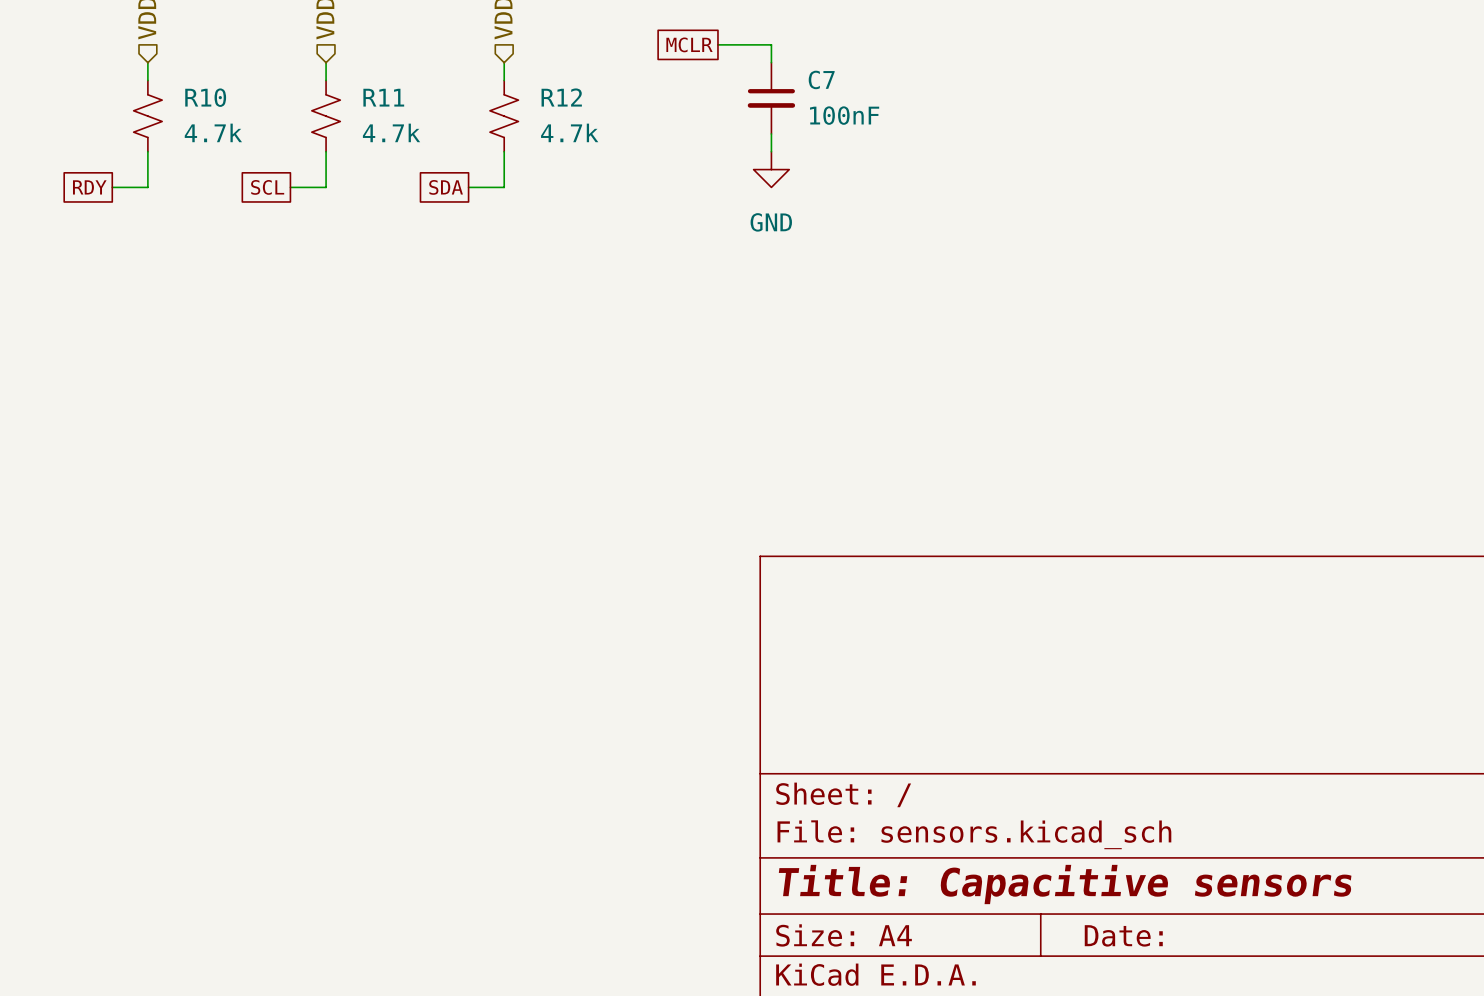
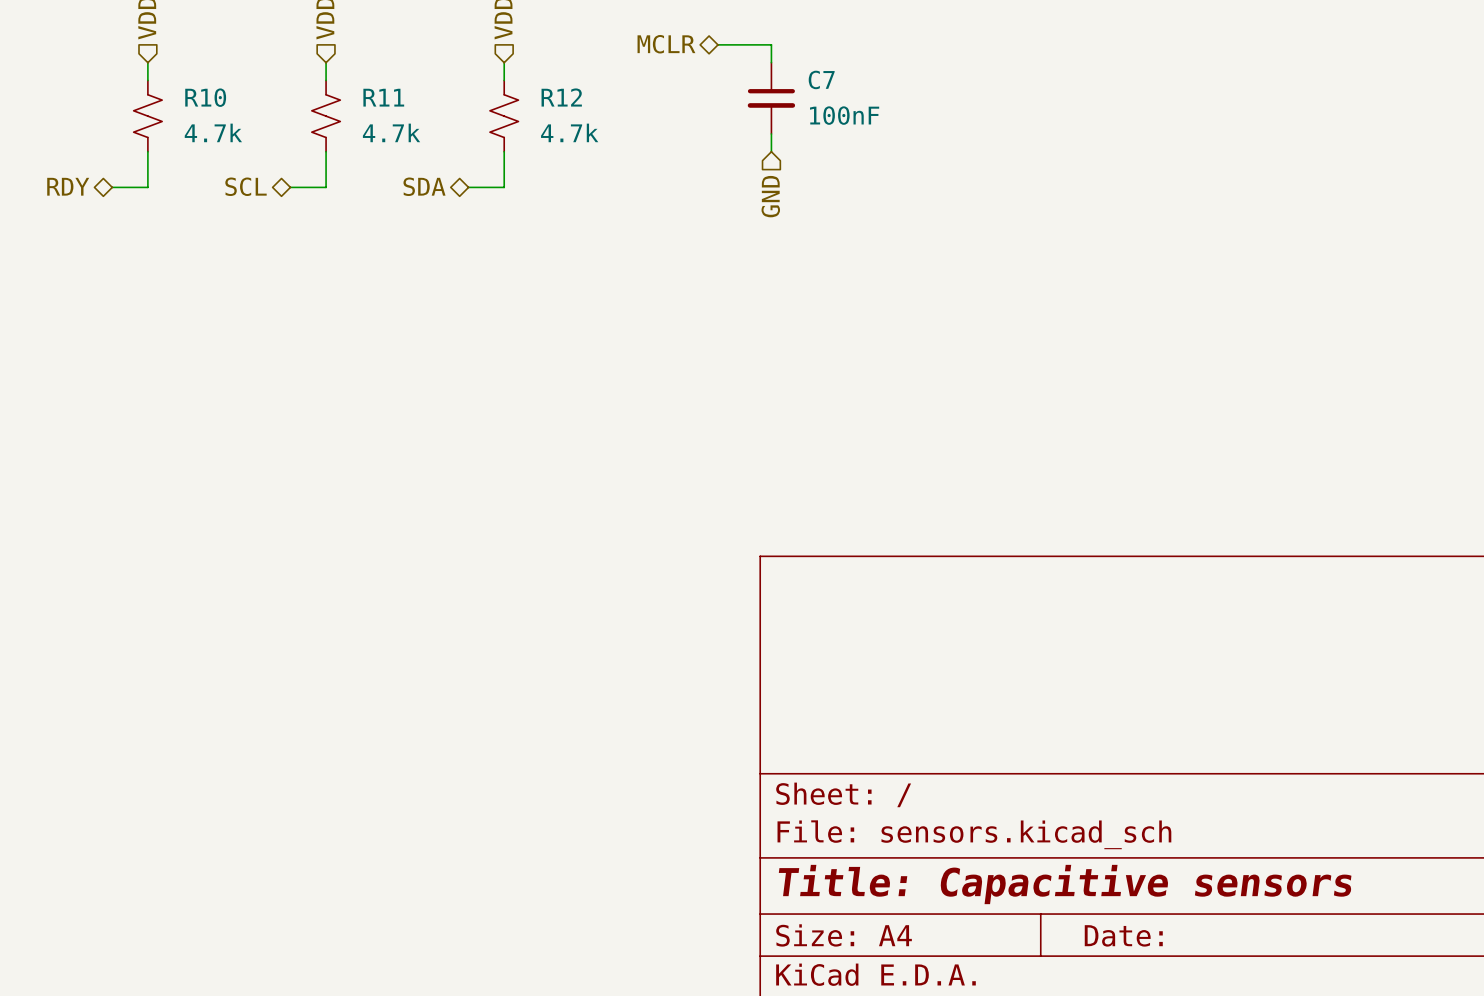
hierarchical label: none -> MCLR (666, 44)
global label: MCLR (689, 44) -> none
power symbol: GND (771, 169) -> none
hierarchical label: none -> RDY (68, 186)
hierarchical label: none -> SCL (246, 186)
hierarchical label: none -> SDA (424, 186)
global label: RDY (89, 187) -> none
global label: SCL (267, 187) -> none
global label: SDA (446, 187) -> none
hierarchical label: none -> GND (770, 196)

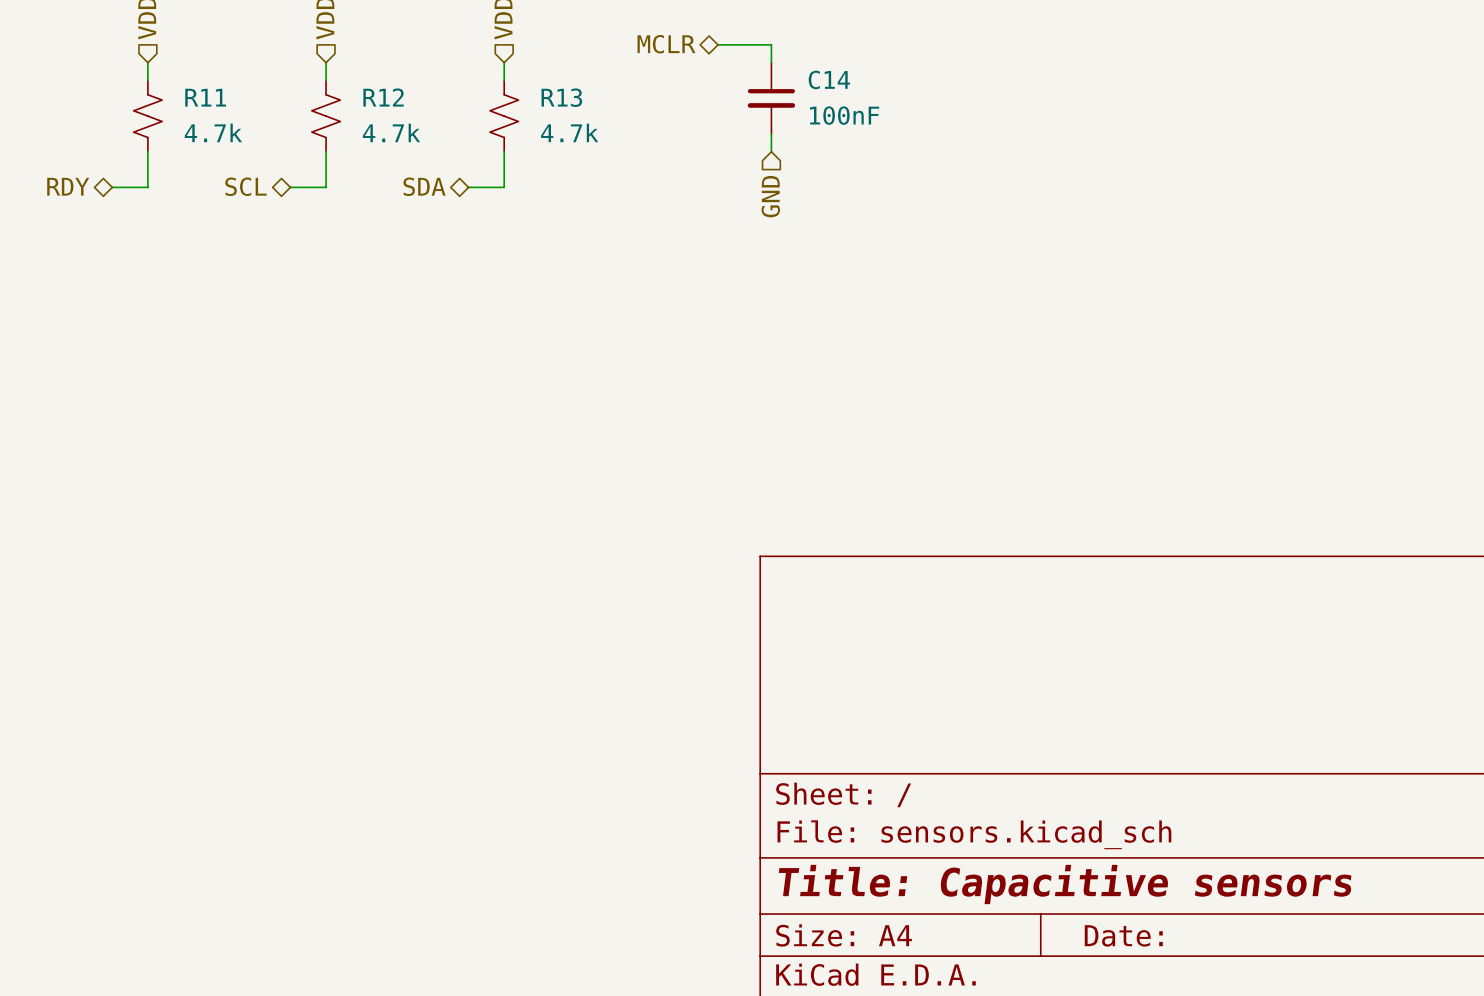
C7 name: C7 (821, 79) -> C14 (829, 79)
R10 name: R10 (205, 97) -> R11 (205, 97)
R11 name: R11 (383, 97) -> R12 (383, 97)
R12 name: R12 (561, 97) -> R13 (561, 97)

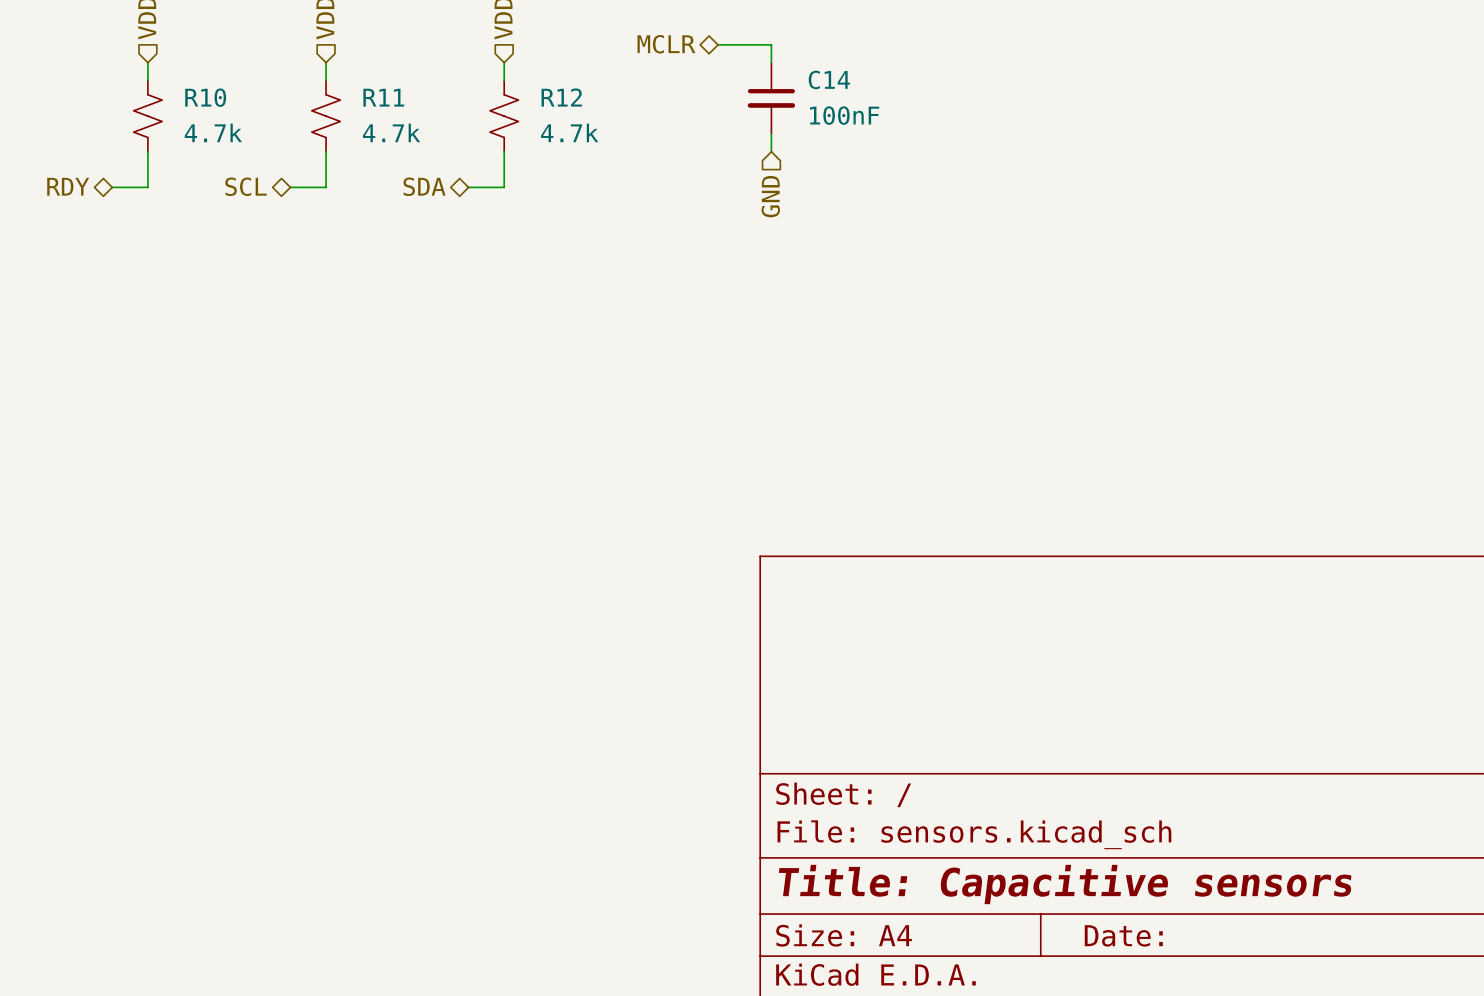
R11 name: R11 (205, 97) -> R10 (205, 97)
R12 name: R12 (383, 97) -> R11 (383, 97)
R13 name: R13 (561, 97) -> R12 (561, 97)

